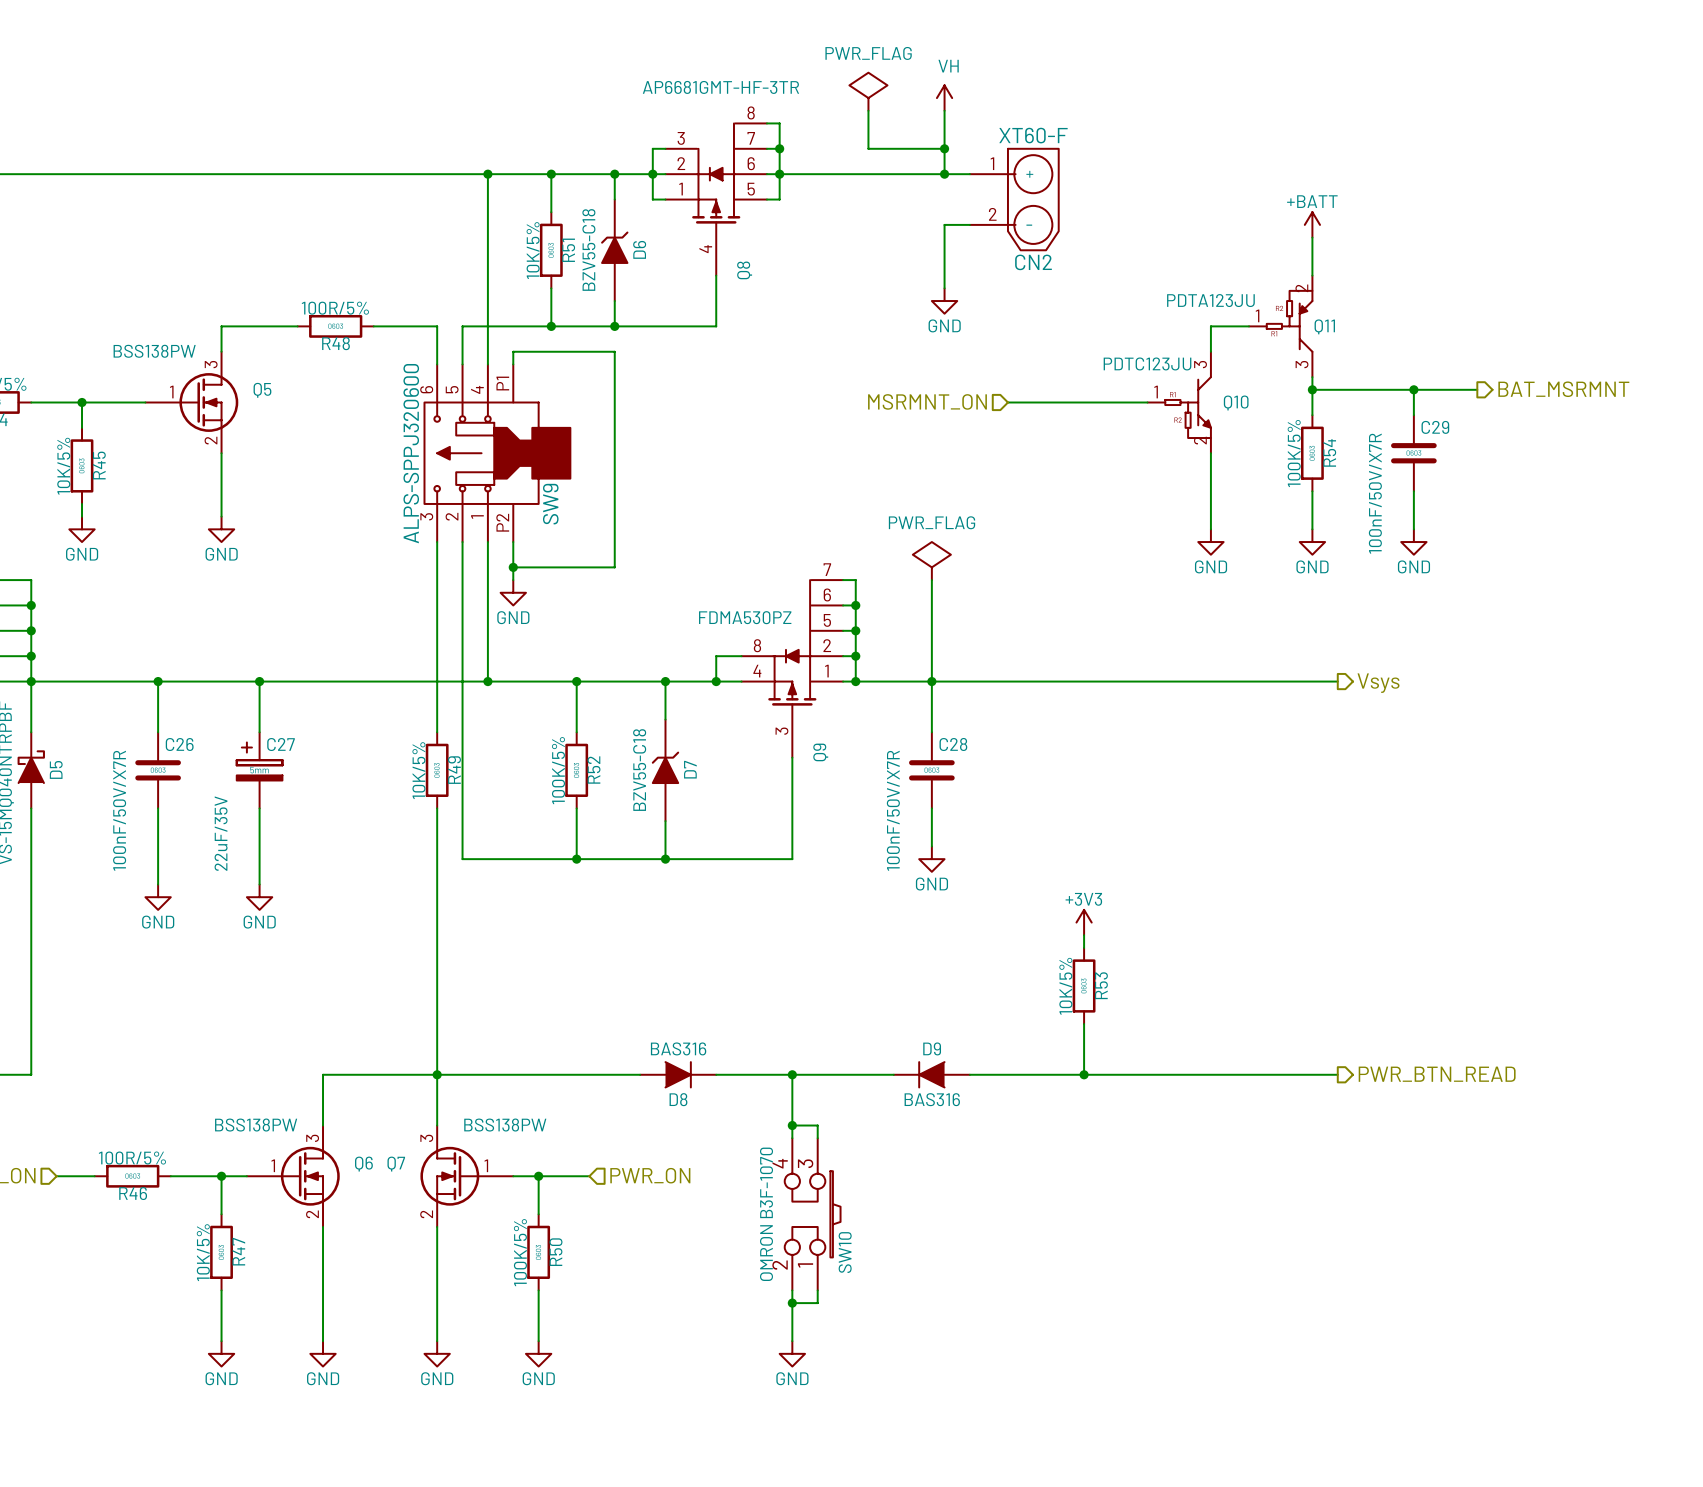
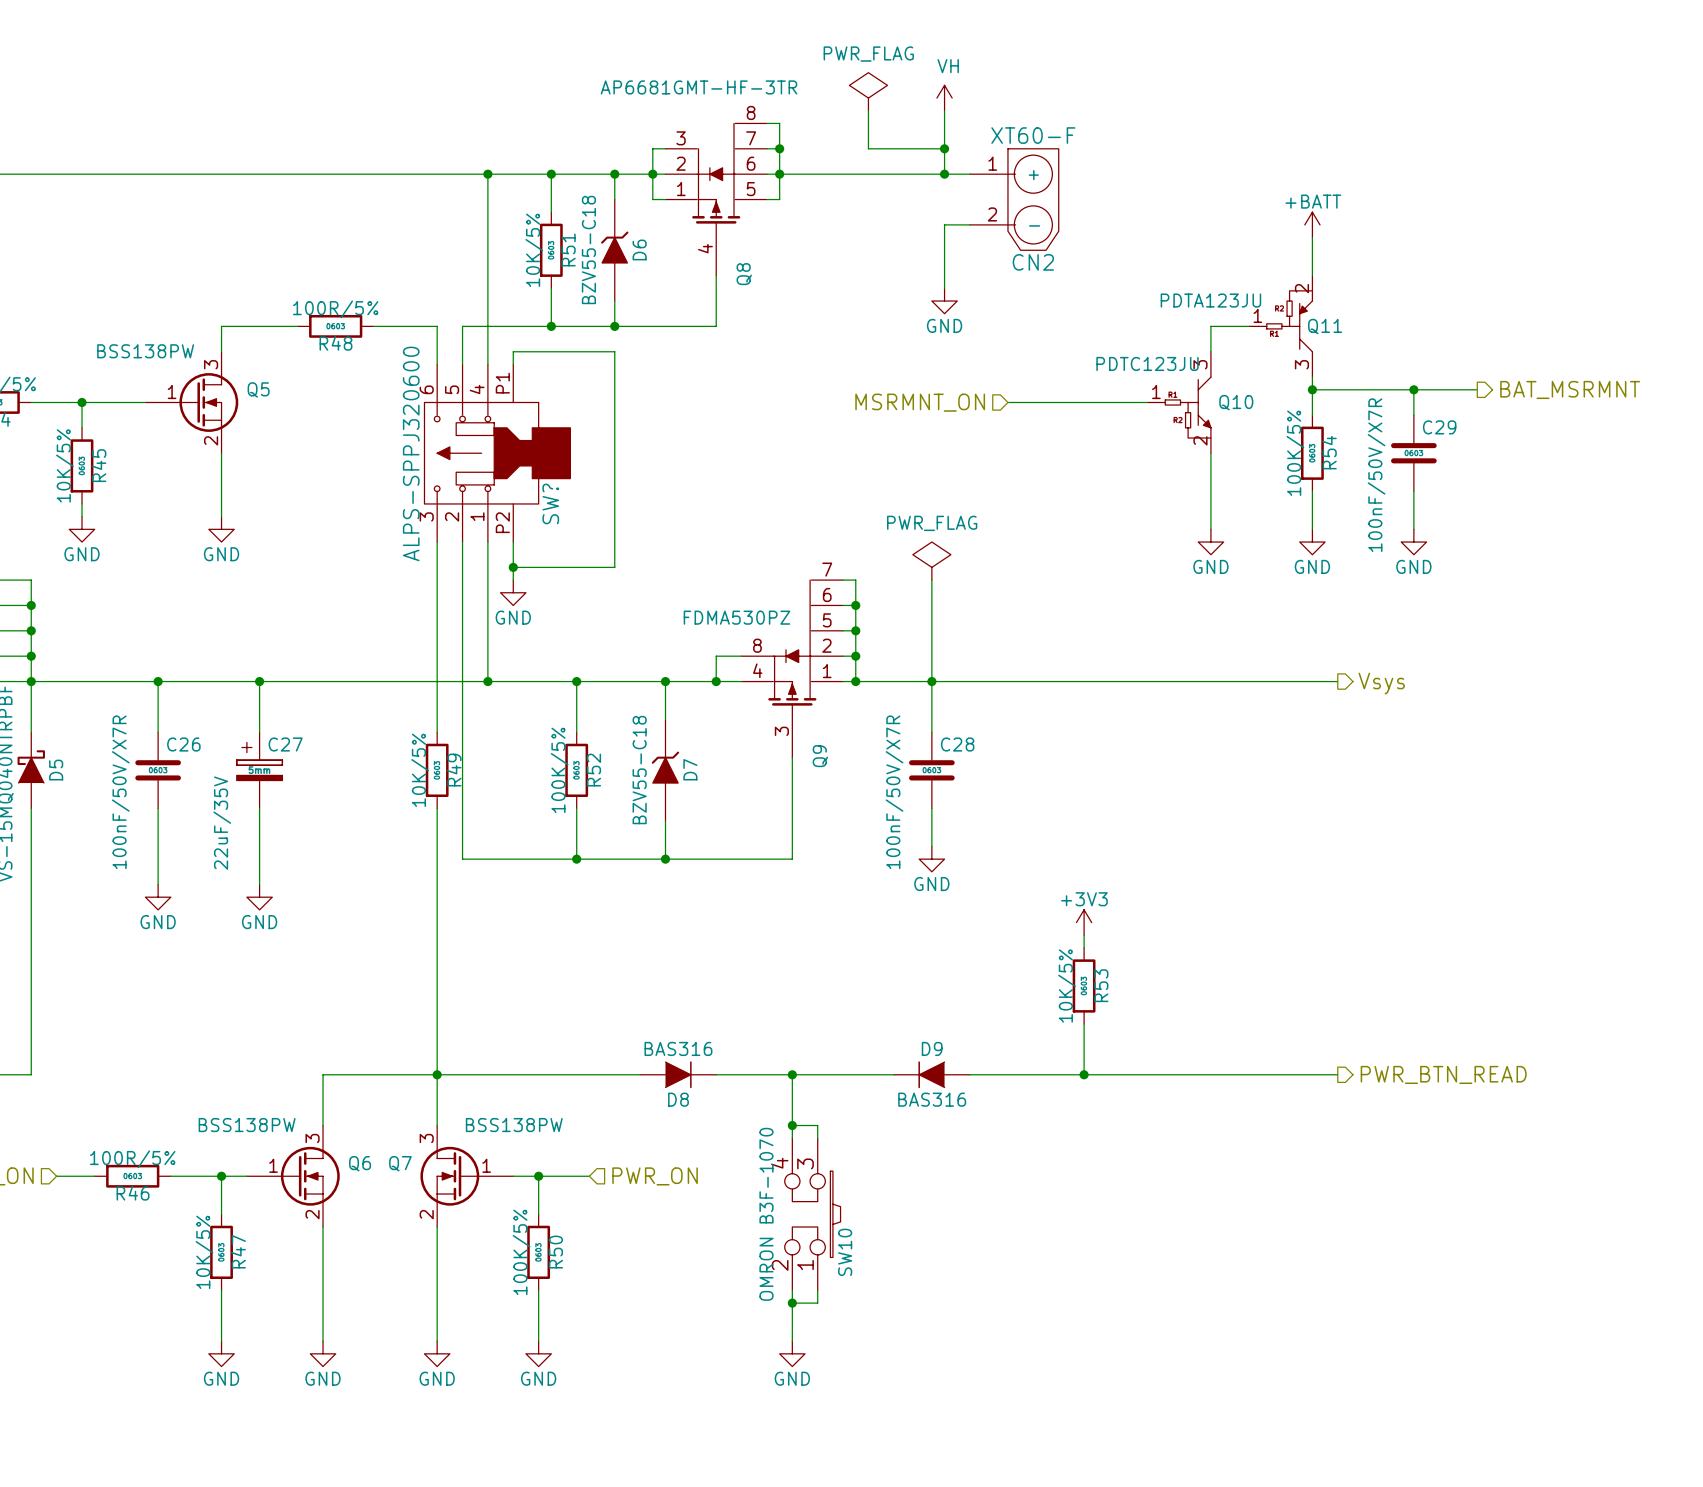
SW9 name: SW9 (550, 504) -> SW? (550, 503)

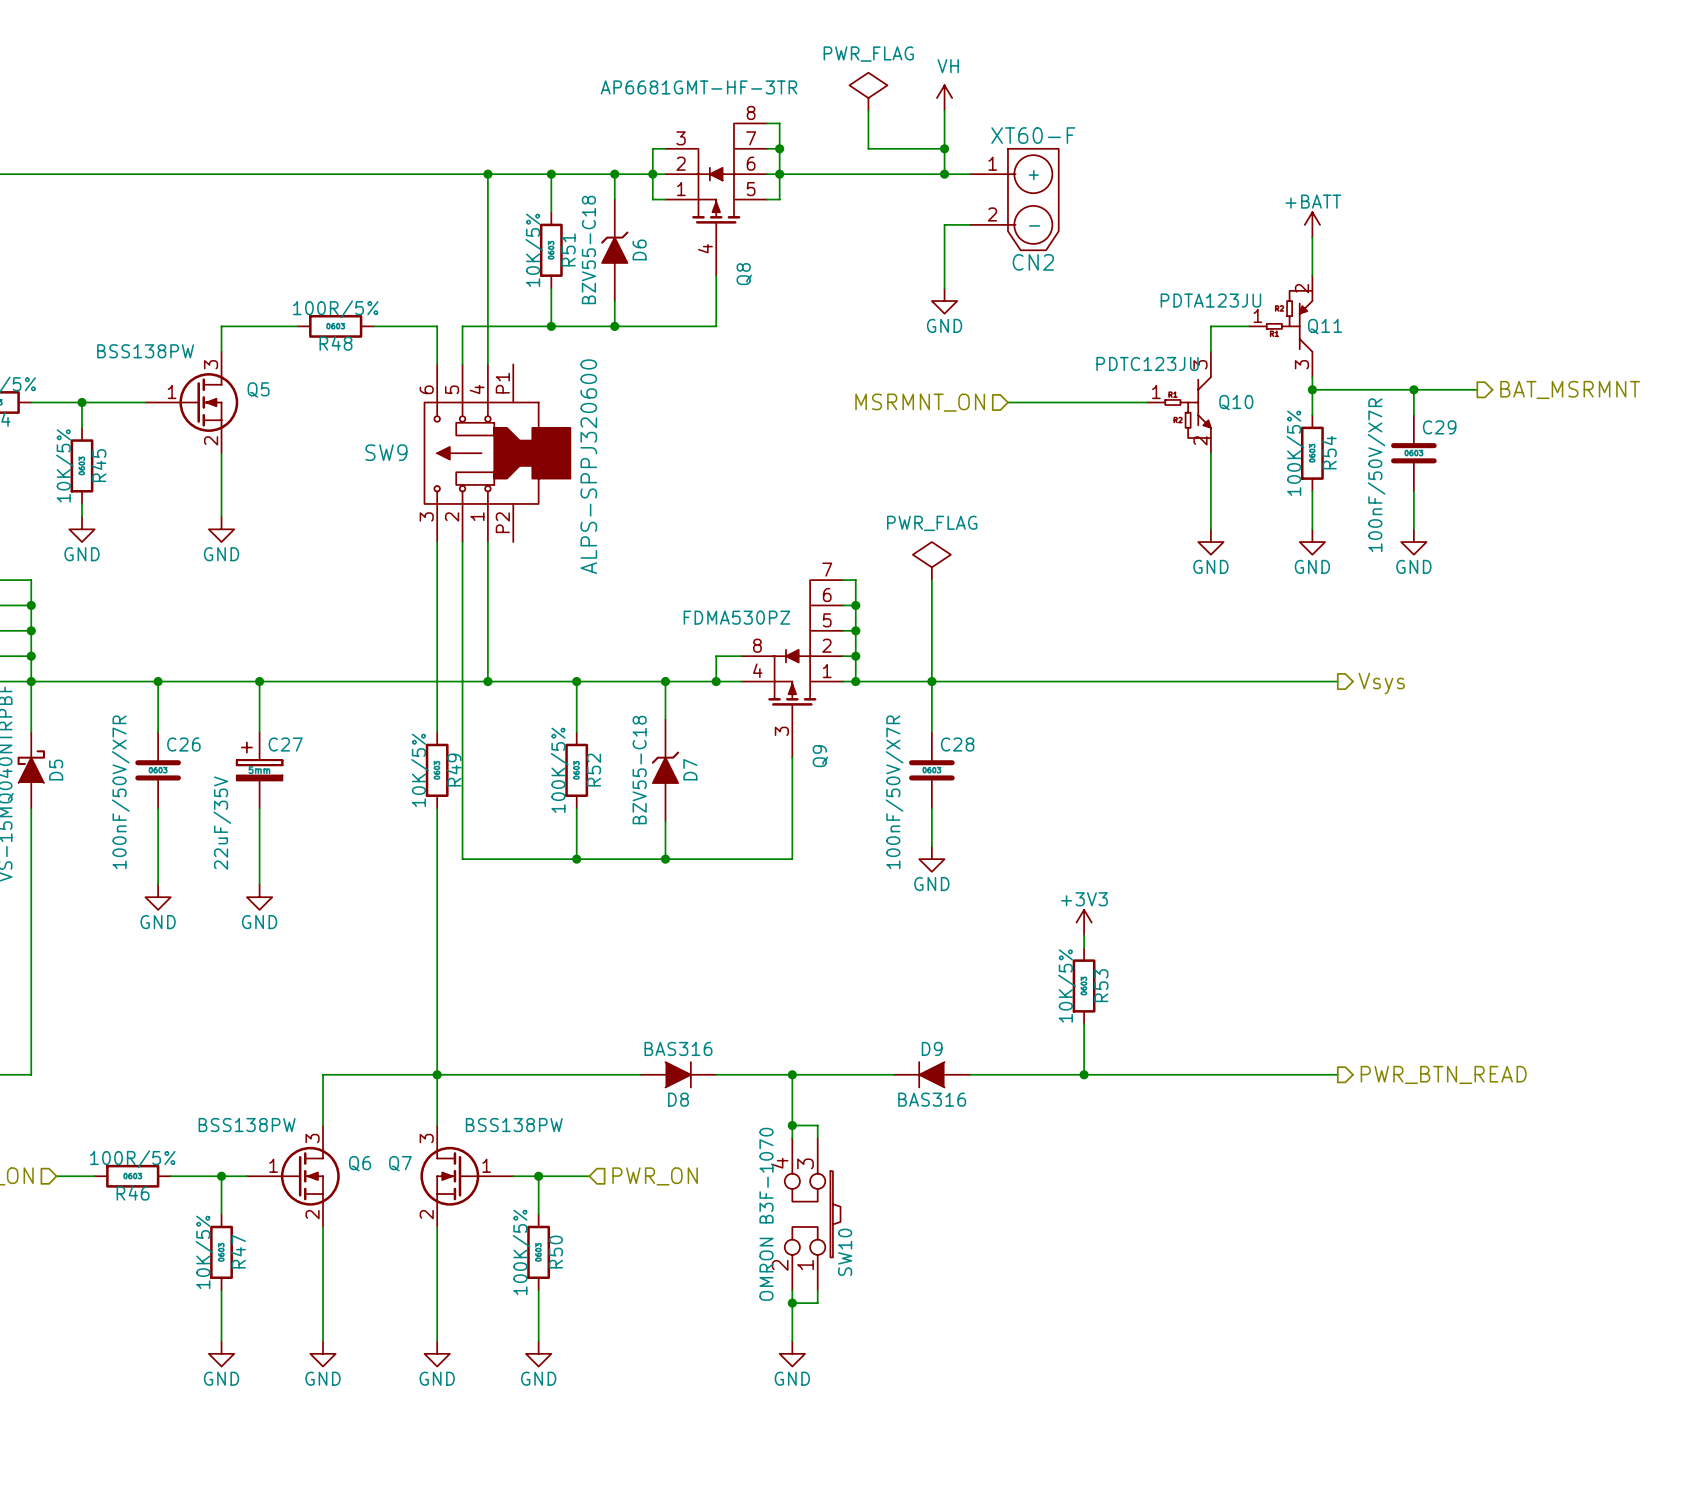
wire: (513, 364) (513, 351) (614, 351) (614, 567) (513, 567) -> none
SW? value position: ALPS-SPPJ320600 (411, 453) -> ALPS-SPPJ320600 (588, 466)
SW? name: SW? (550, 503) -> SW9 (386, 452)
wire: (513, 542) (513, 580) -> none
junction: (513, 567) -> none
power symbol: GND (513, 592) -> none

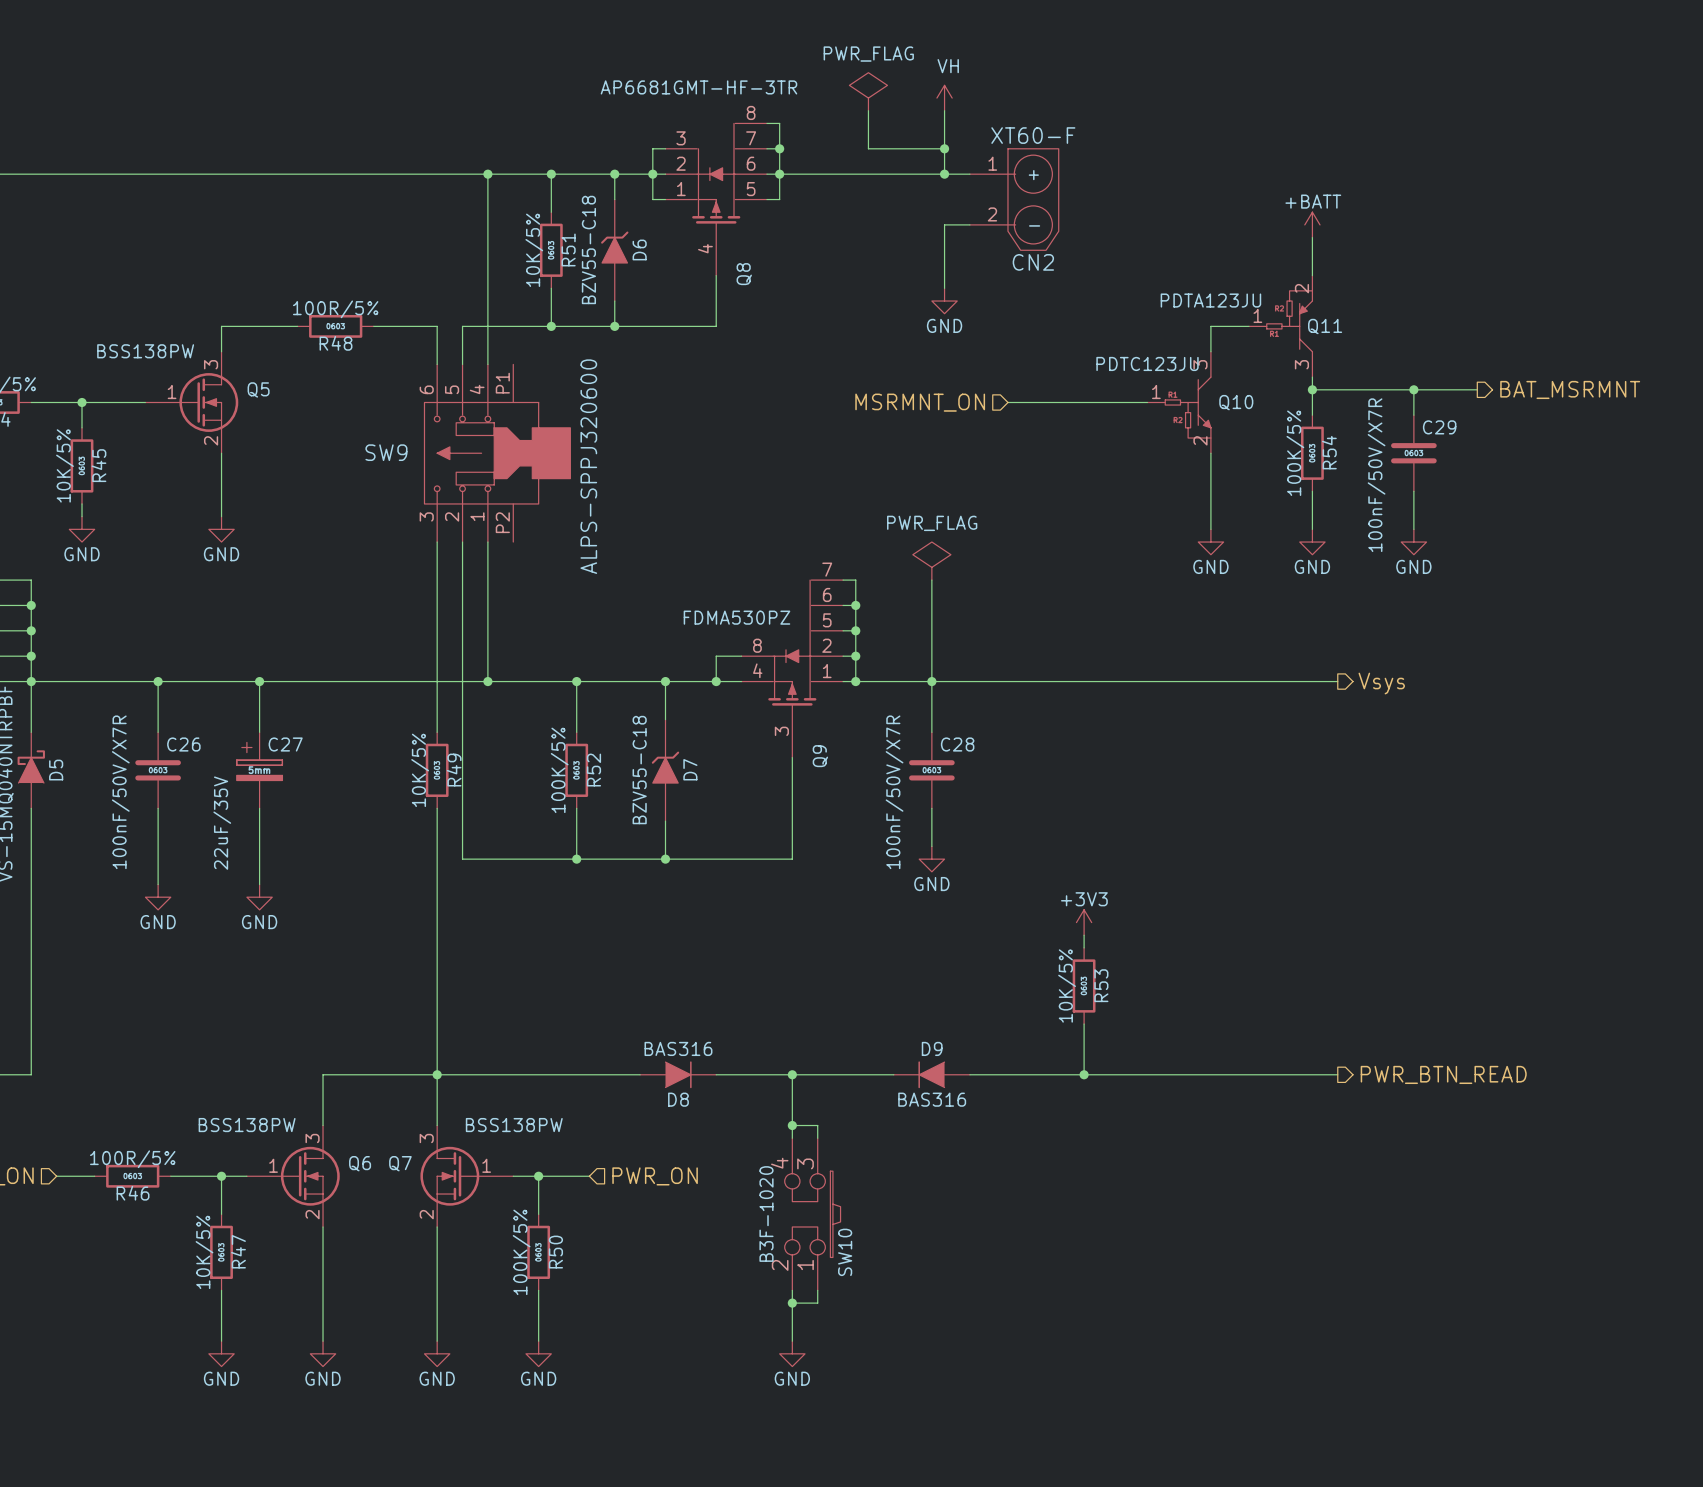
SW10 value: OMRON B3F-1070 (766, 1214) -> B3F-1020 (766, 1214)

